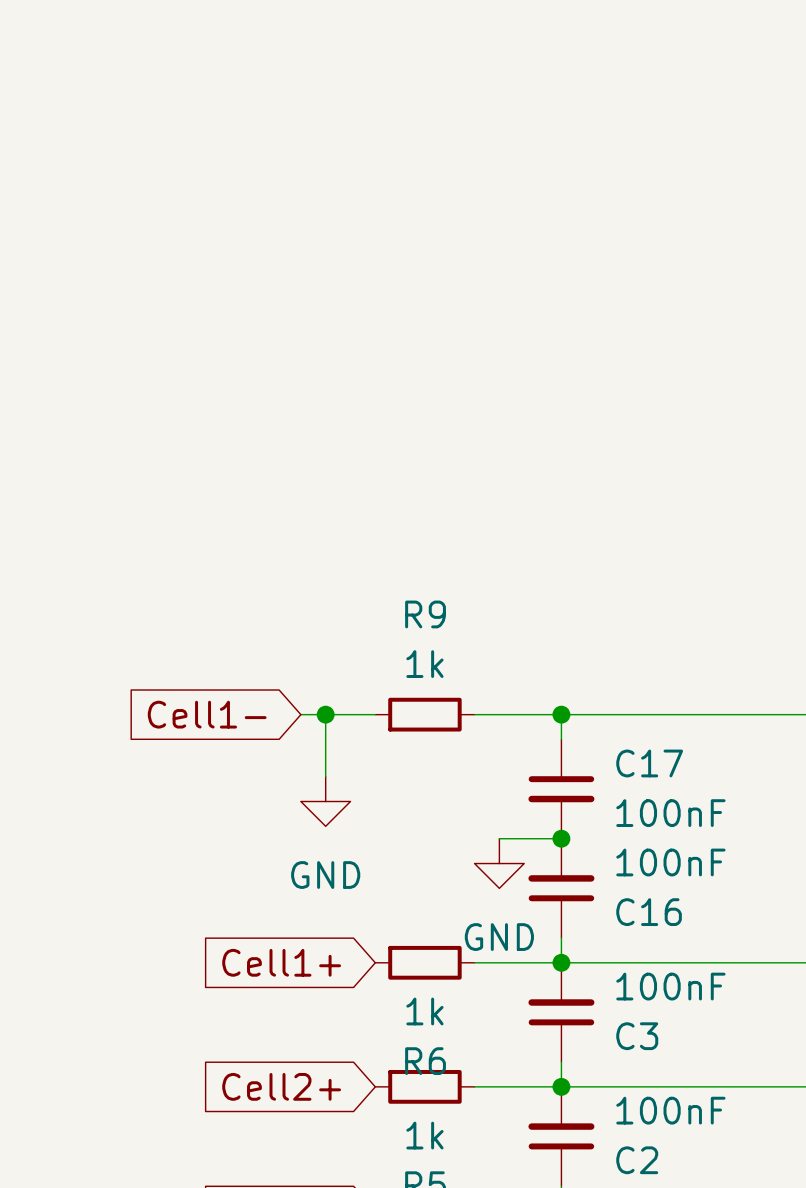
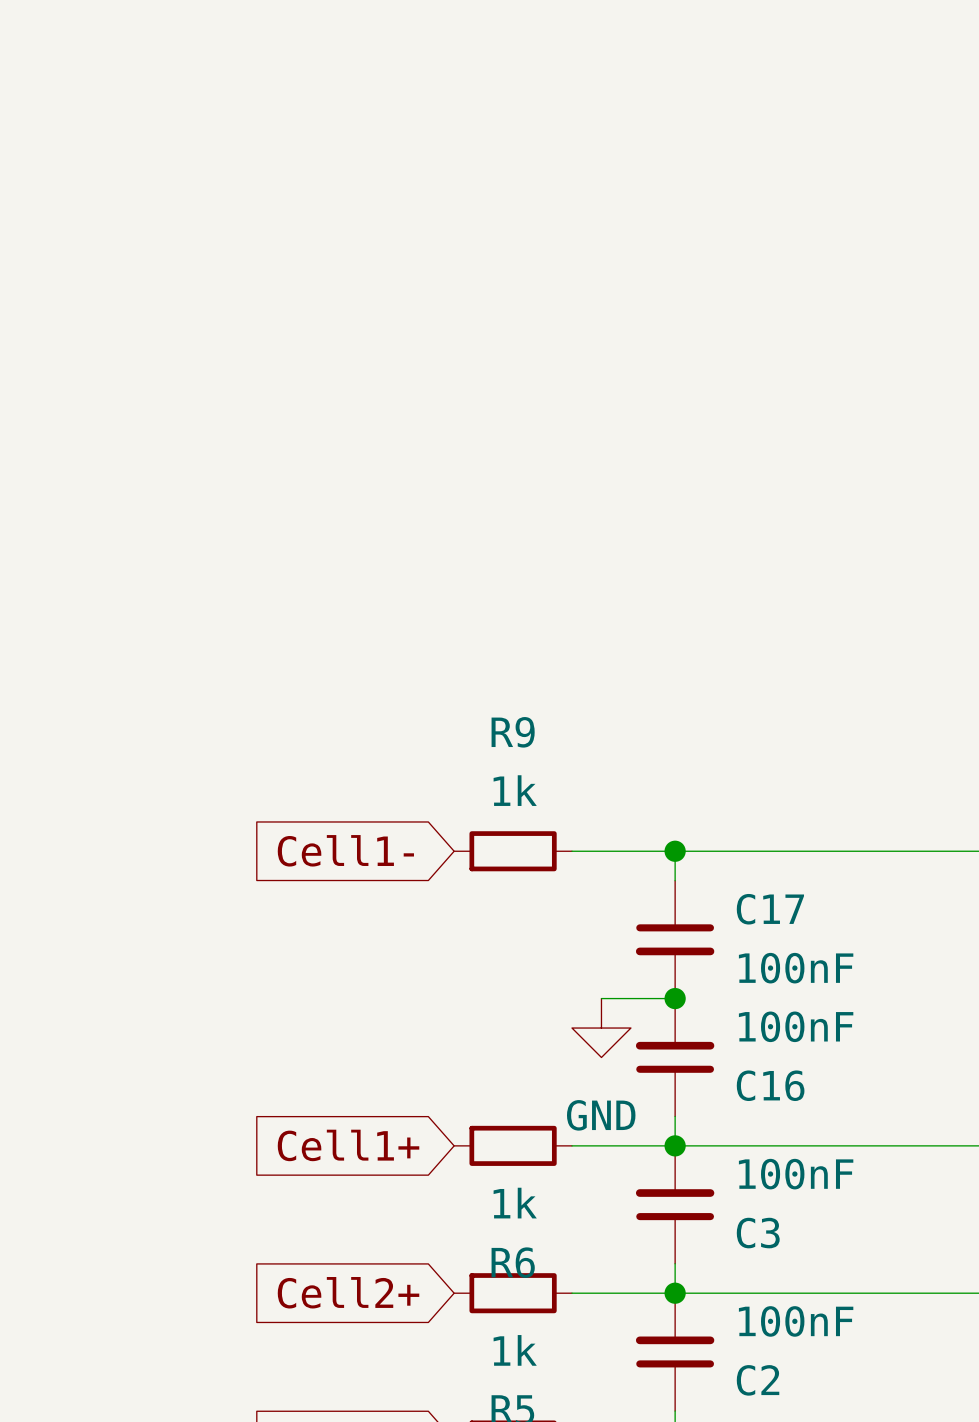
global label position: Cell1- (207, 714) -> Cell1- (345, 850)
wire: (300, 714) (375, 714) -> none
wire: (325, 714) (325, 776) -> none
junction: (325, 714) -> none
power symbol: GND (325, 801) -> none

